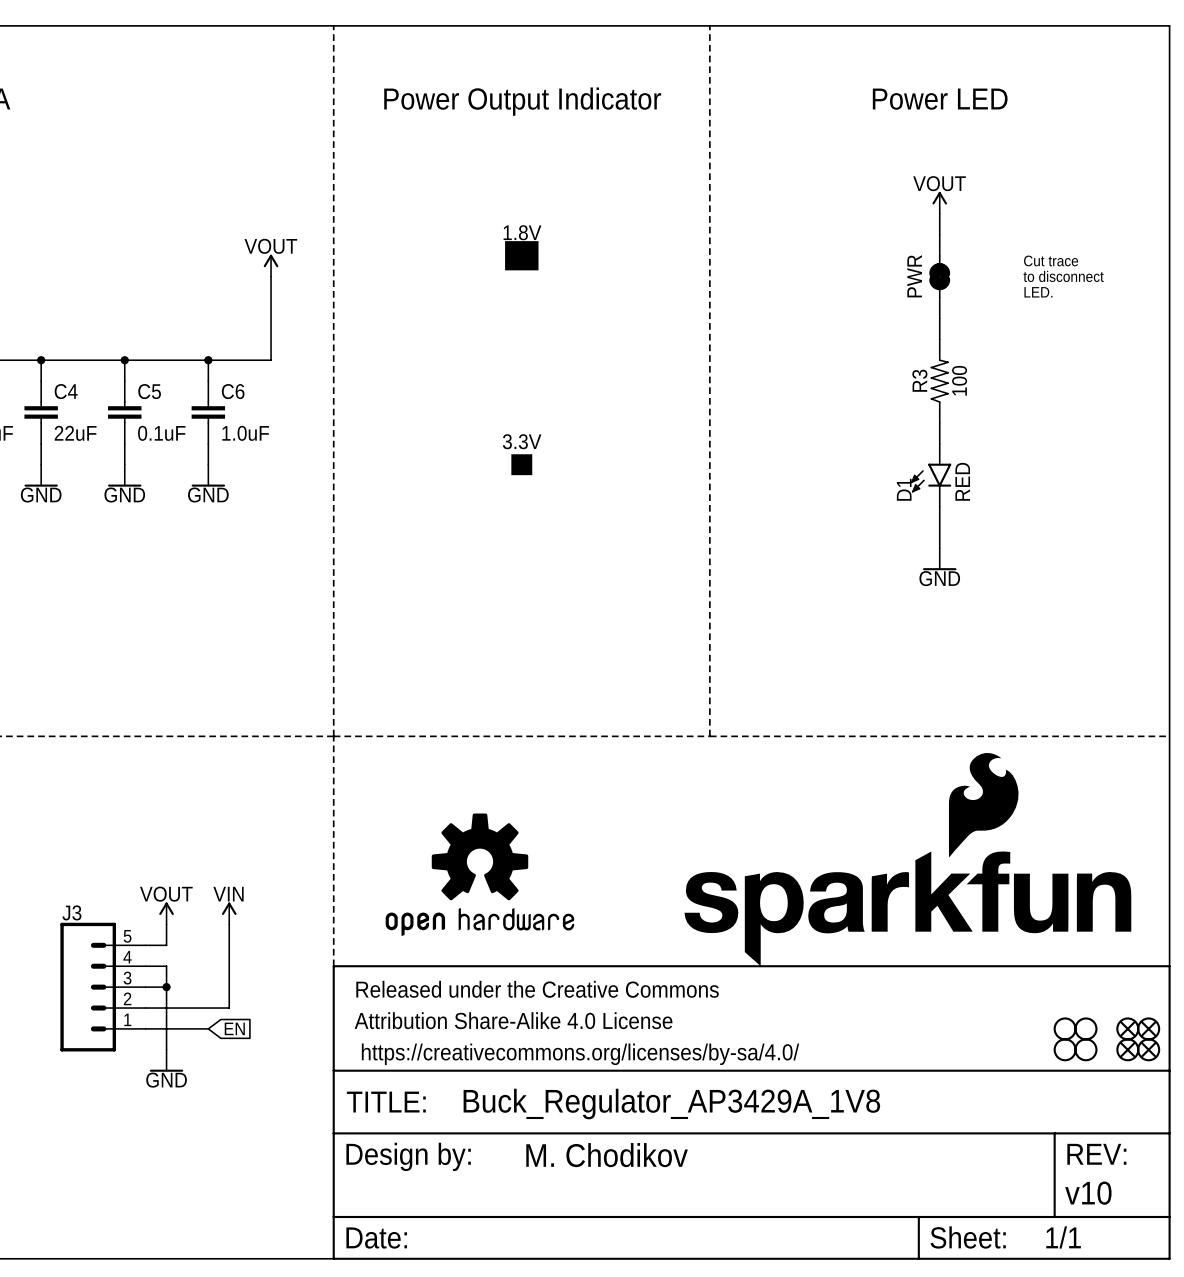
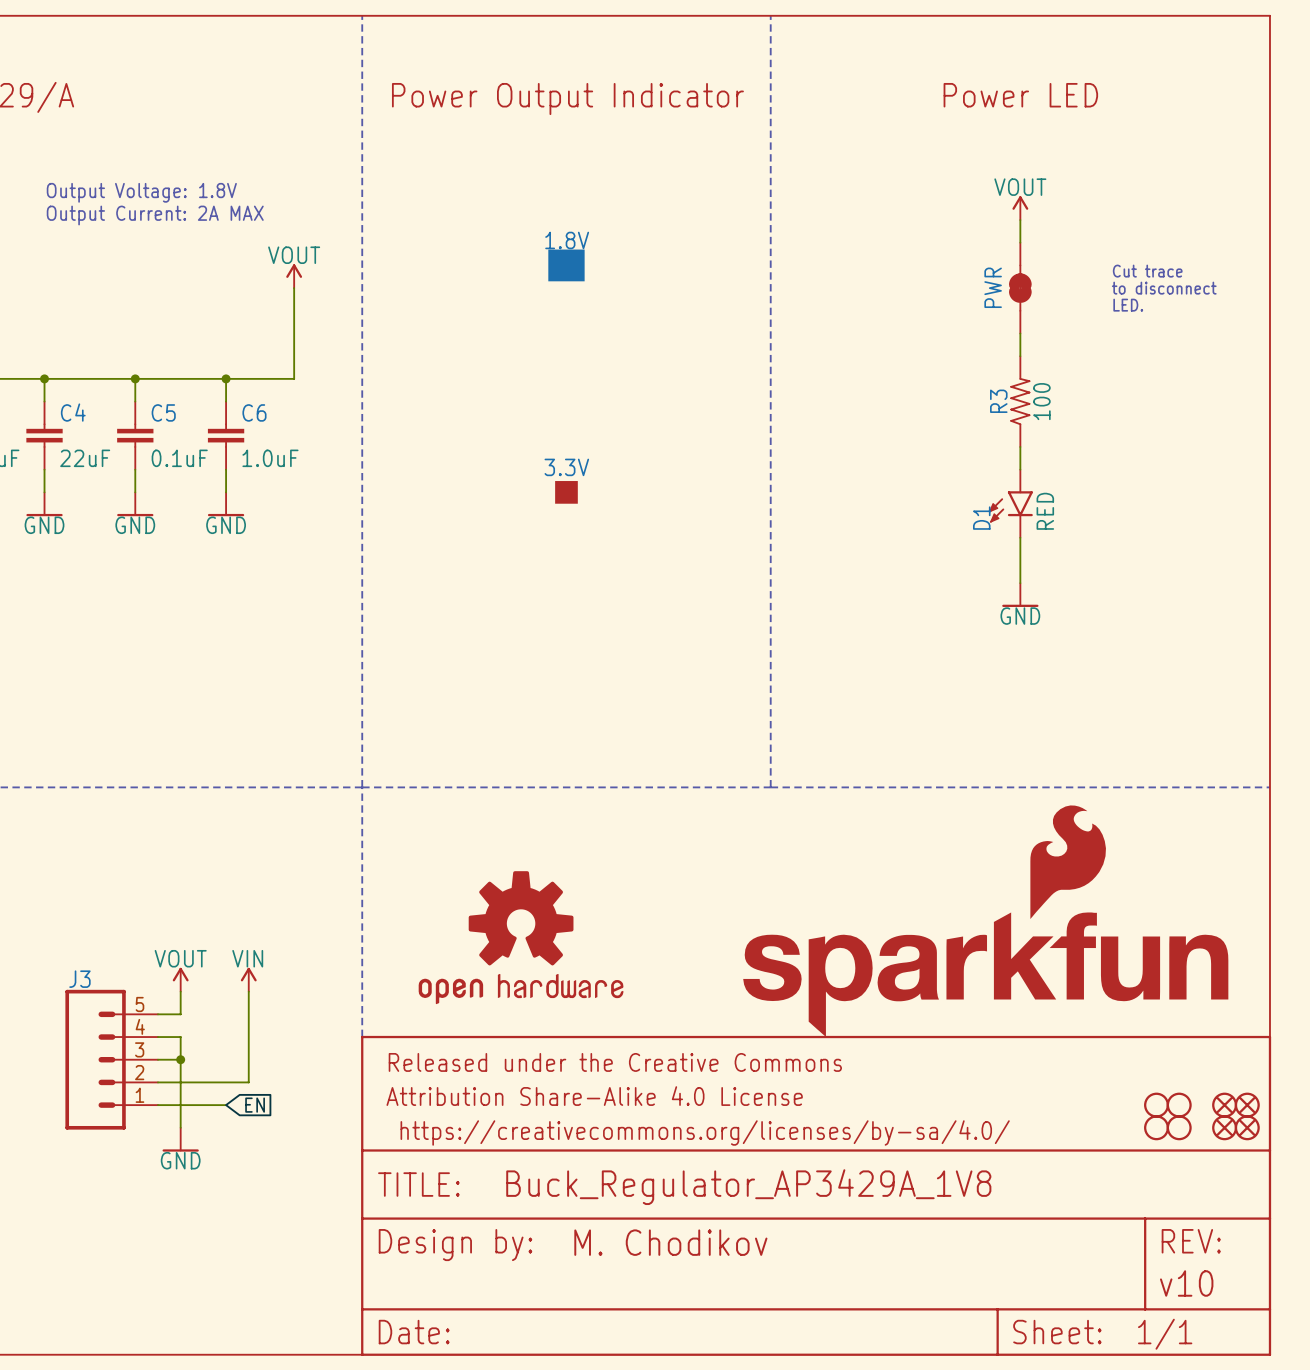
text: none -> Output Voltage: 1.8V (141, 192)
text: none -> Output Current: 2A MAX (155, 215)

